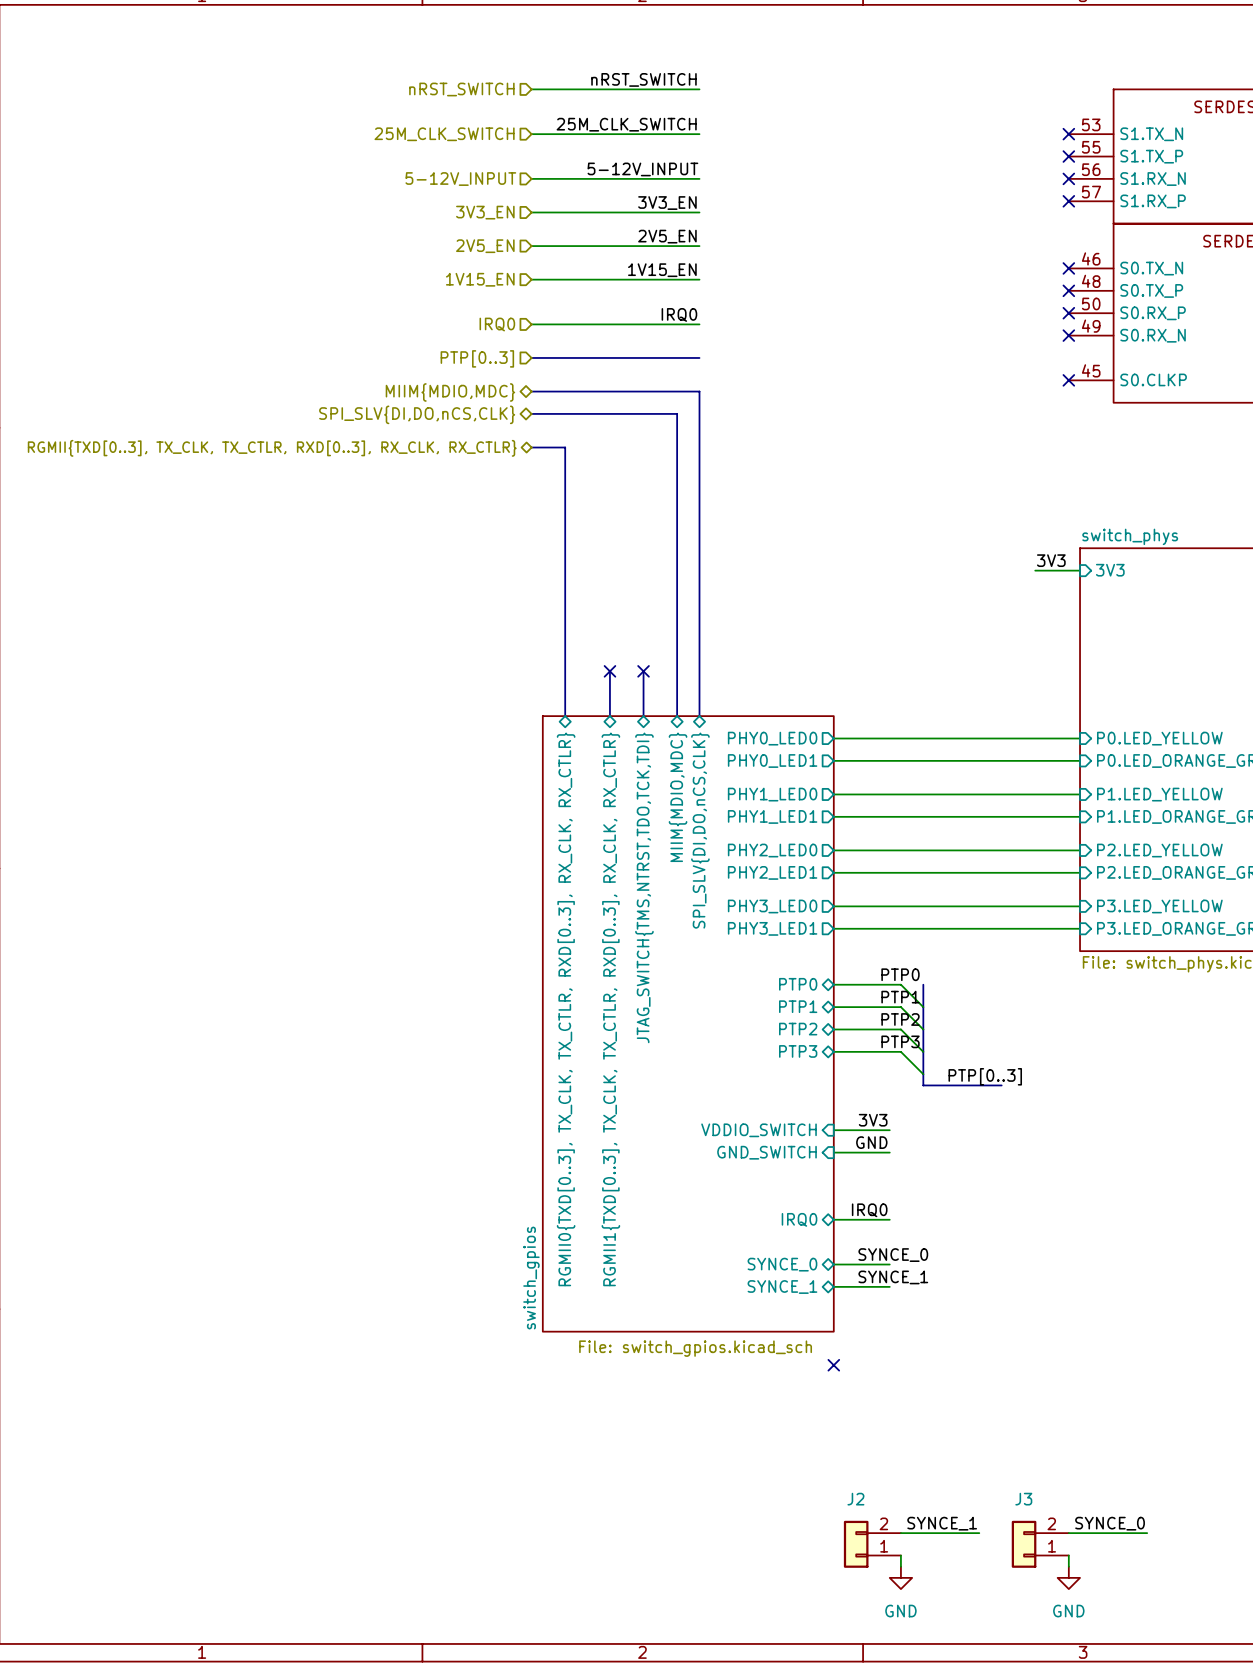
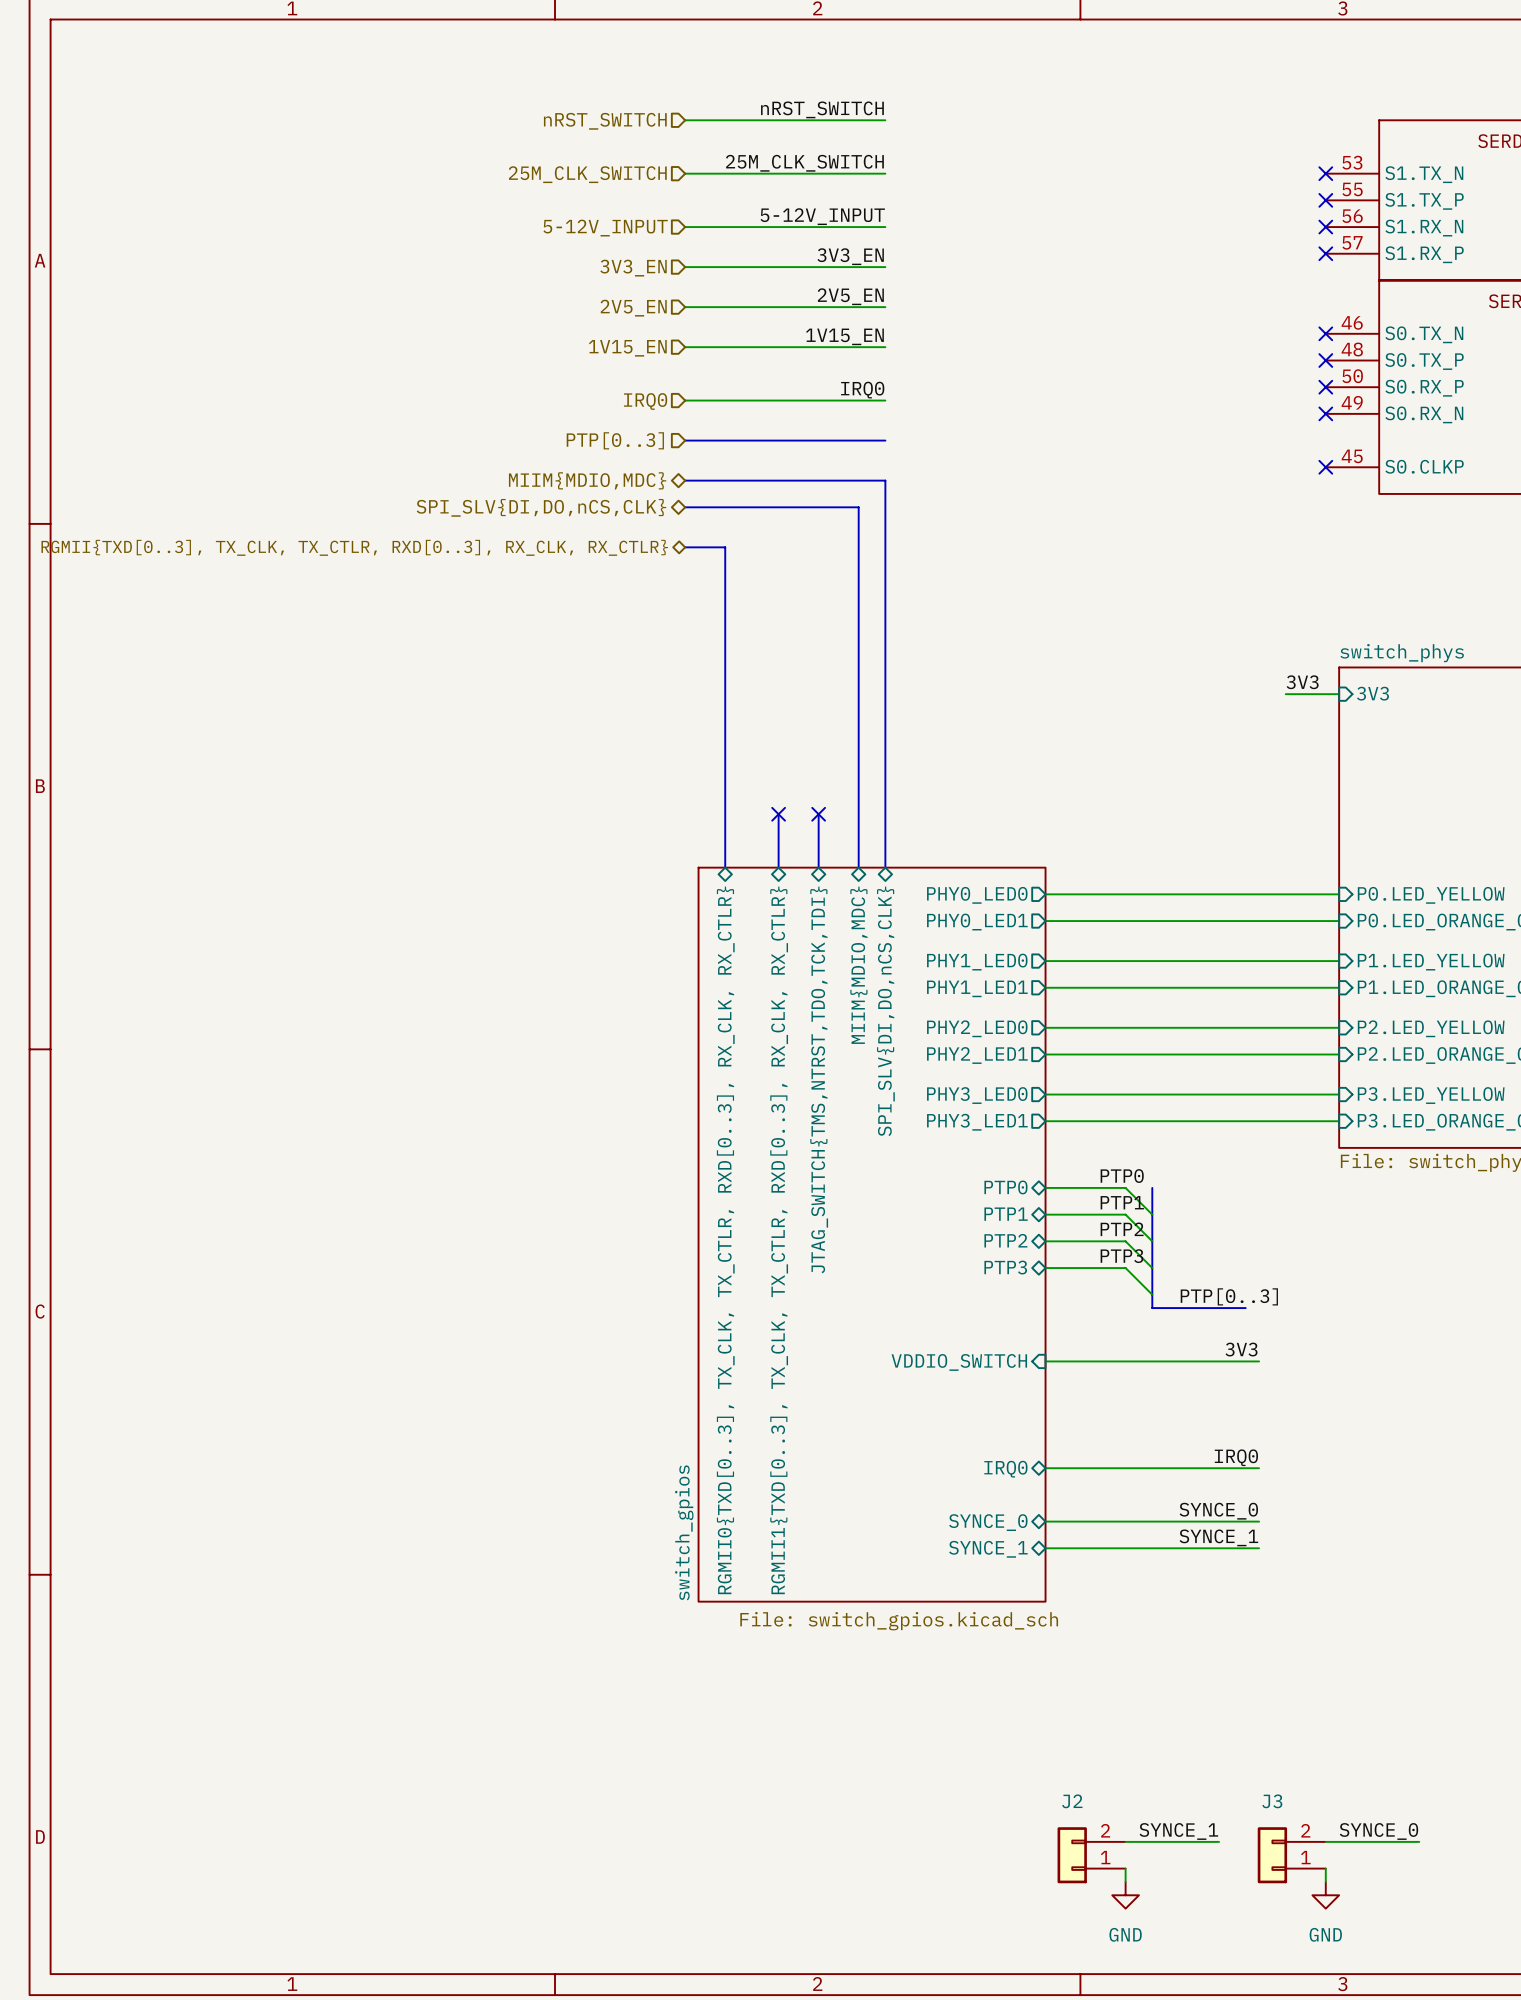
label position: 3V3 (873, 1120) -> 3V3 (1241, 1349)
wire: none -> (1112, 1361) (1259, 1361)
label: GND (871, 1142) -> none
sheet pin: GND_SWITCH (767, 1152) -> none
wire: (833, 1152) (889, 1152) -> none
label position: IRQ0 (869, 1210) -> IRQ0 (1236, 1457)
wire: none -> (1112, 1468) (1259, 1468)
label position: SYNCE_0 (893, 1255) -> SYNCE_0 (1218, 1511)
wire: none -> (1112, 1521) (1259, 1521)
label position: SYNCE_1 (893, 1277) -> SYNCE_1 (1218, 1537)
wire: none -> (1112, 1548) (1259, 1548)
no-connect mark: (833, 1365) -> none

